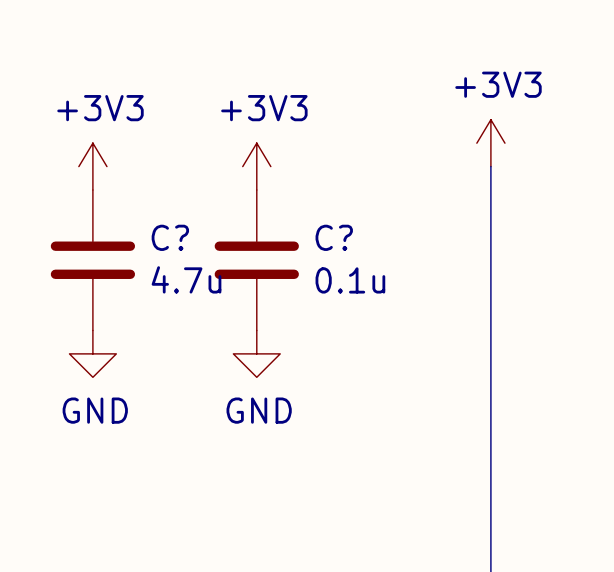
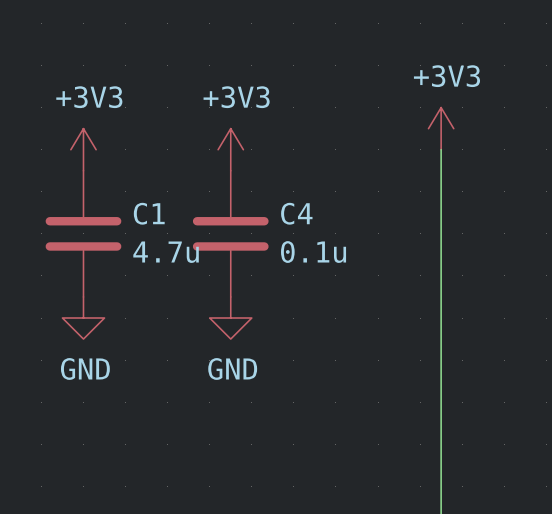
C? name: C? (170, 237) -> C1 (149, 213)
C? name: C? (334, 237) -> C4 (296, 213)

